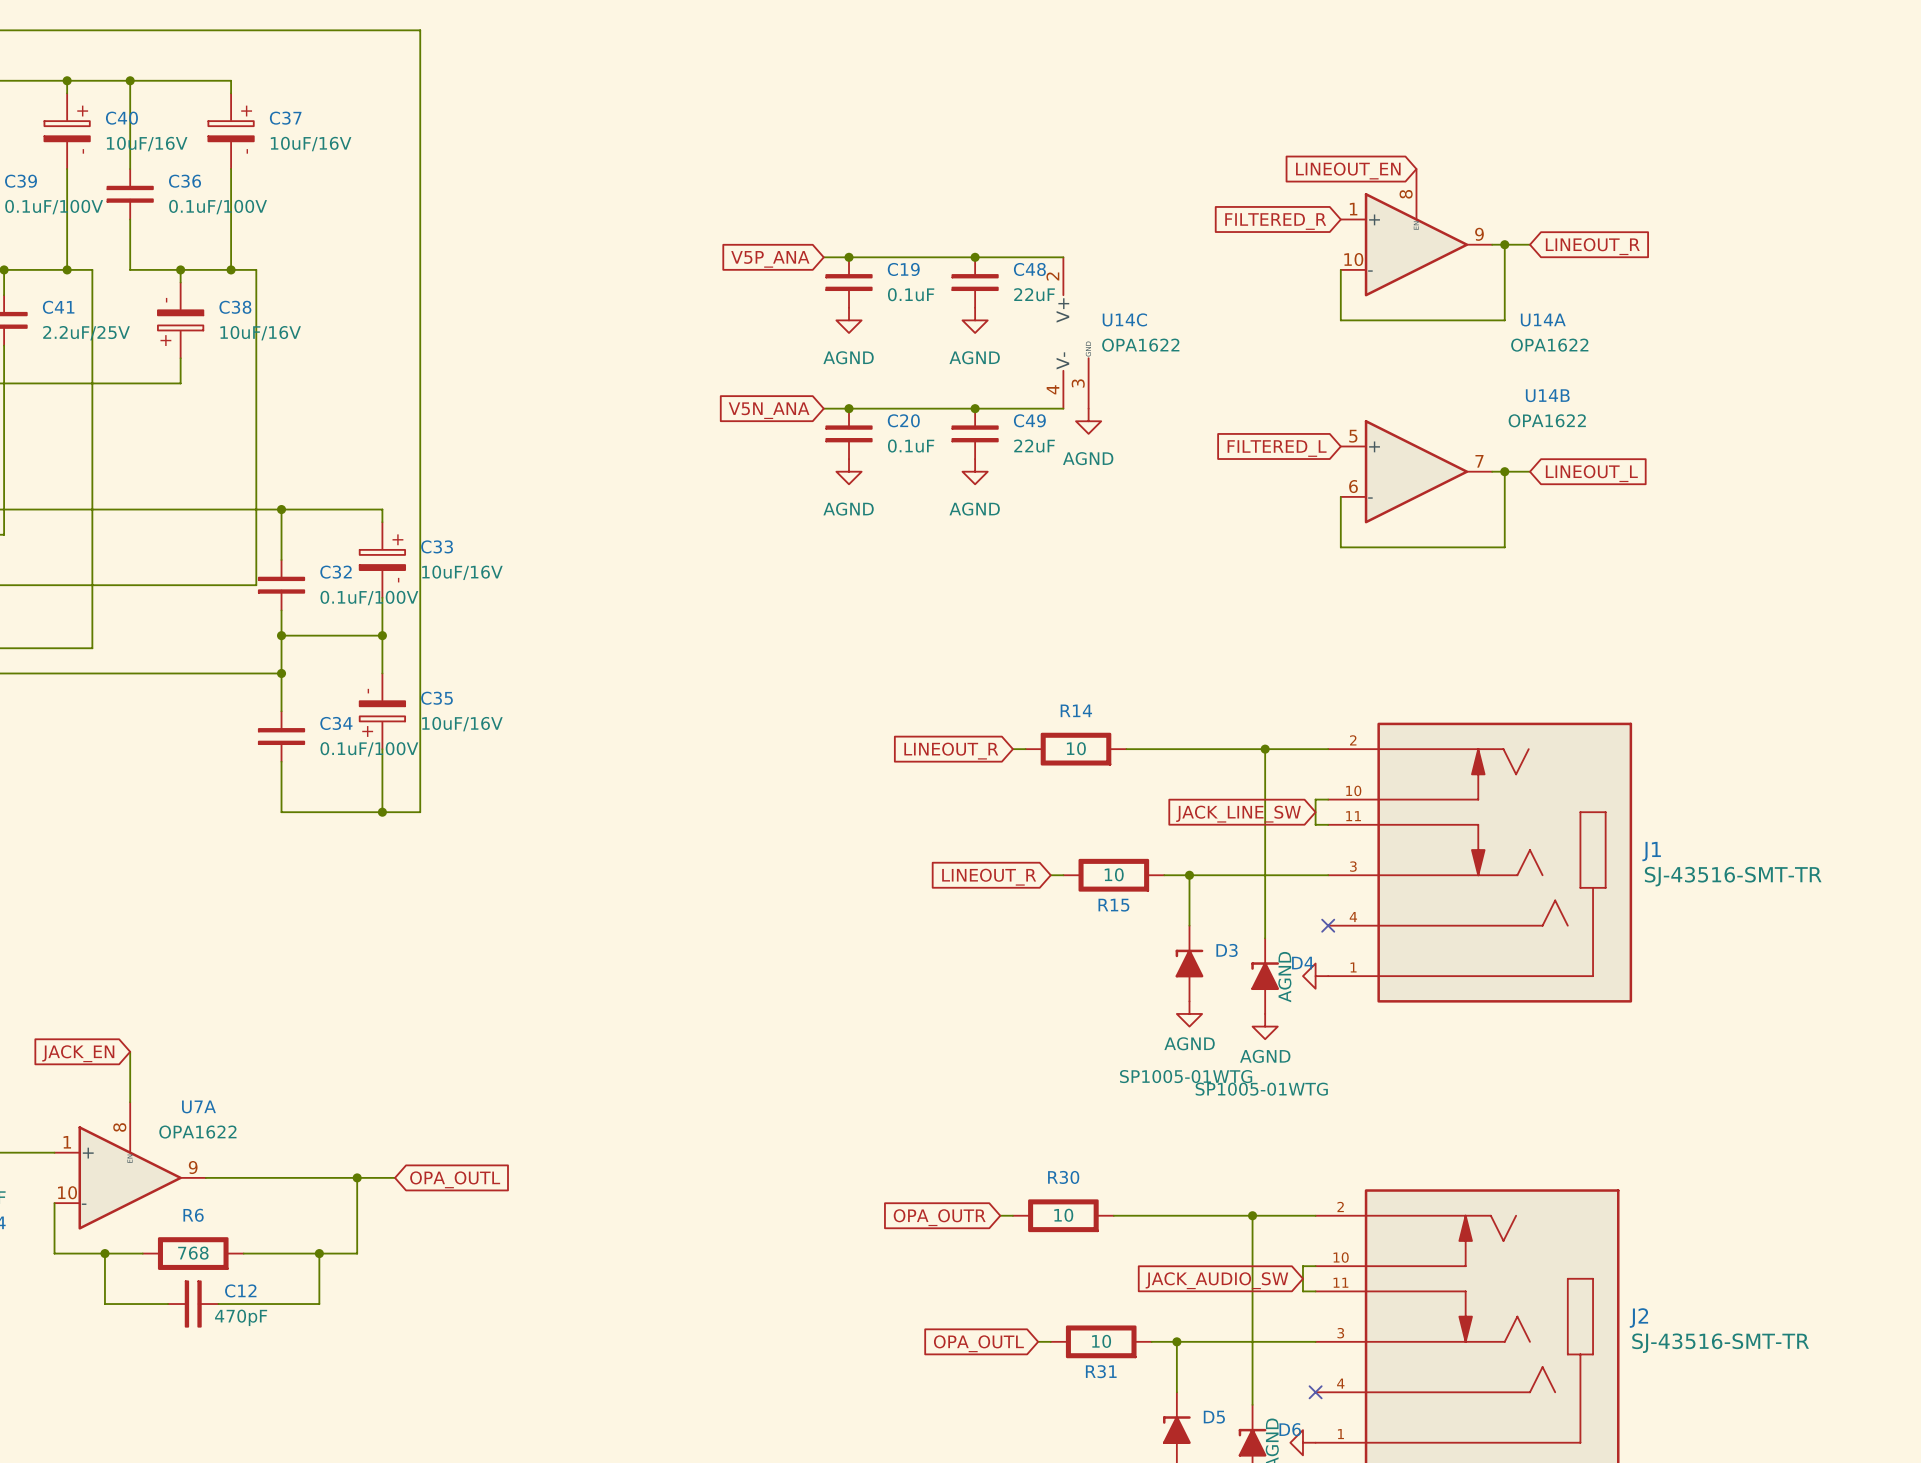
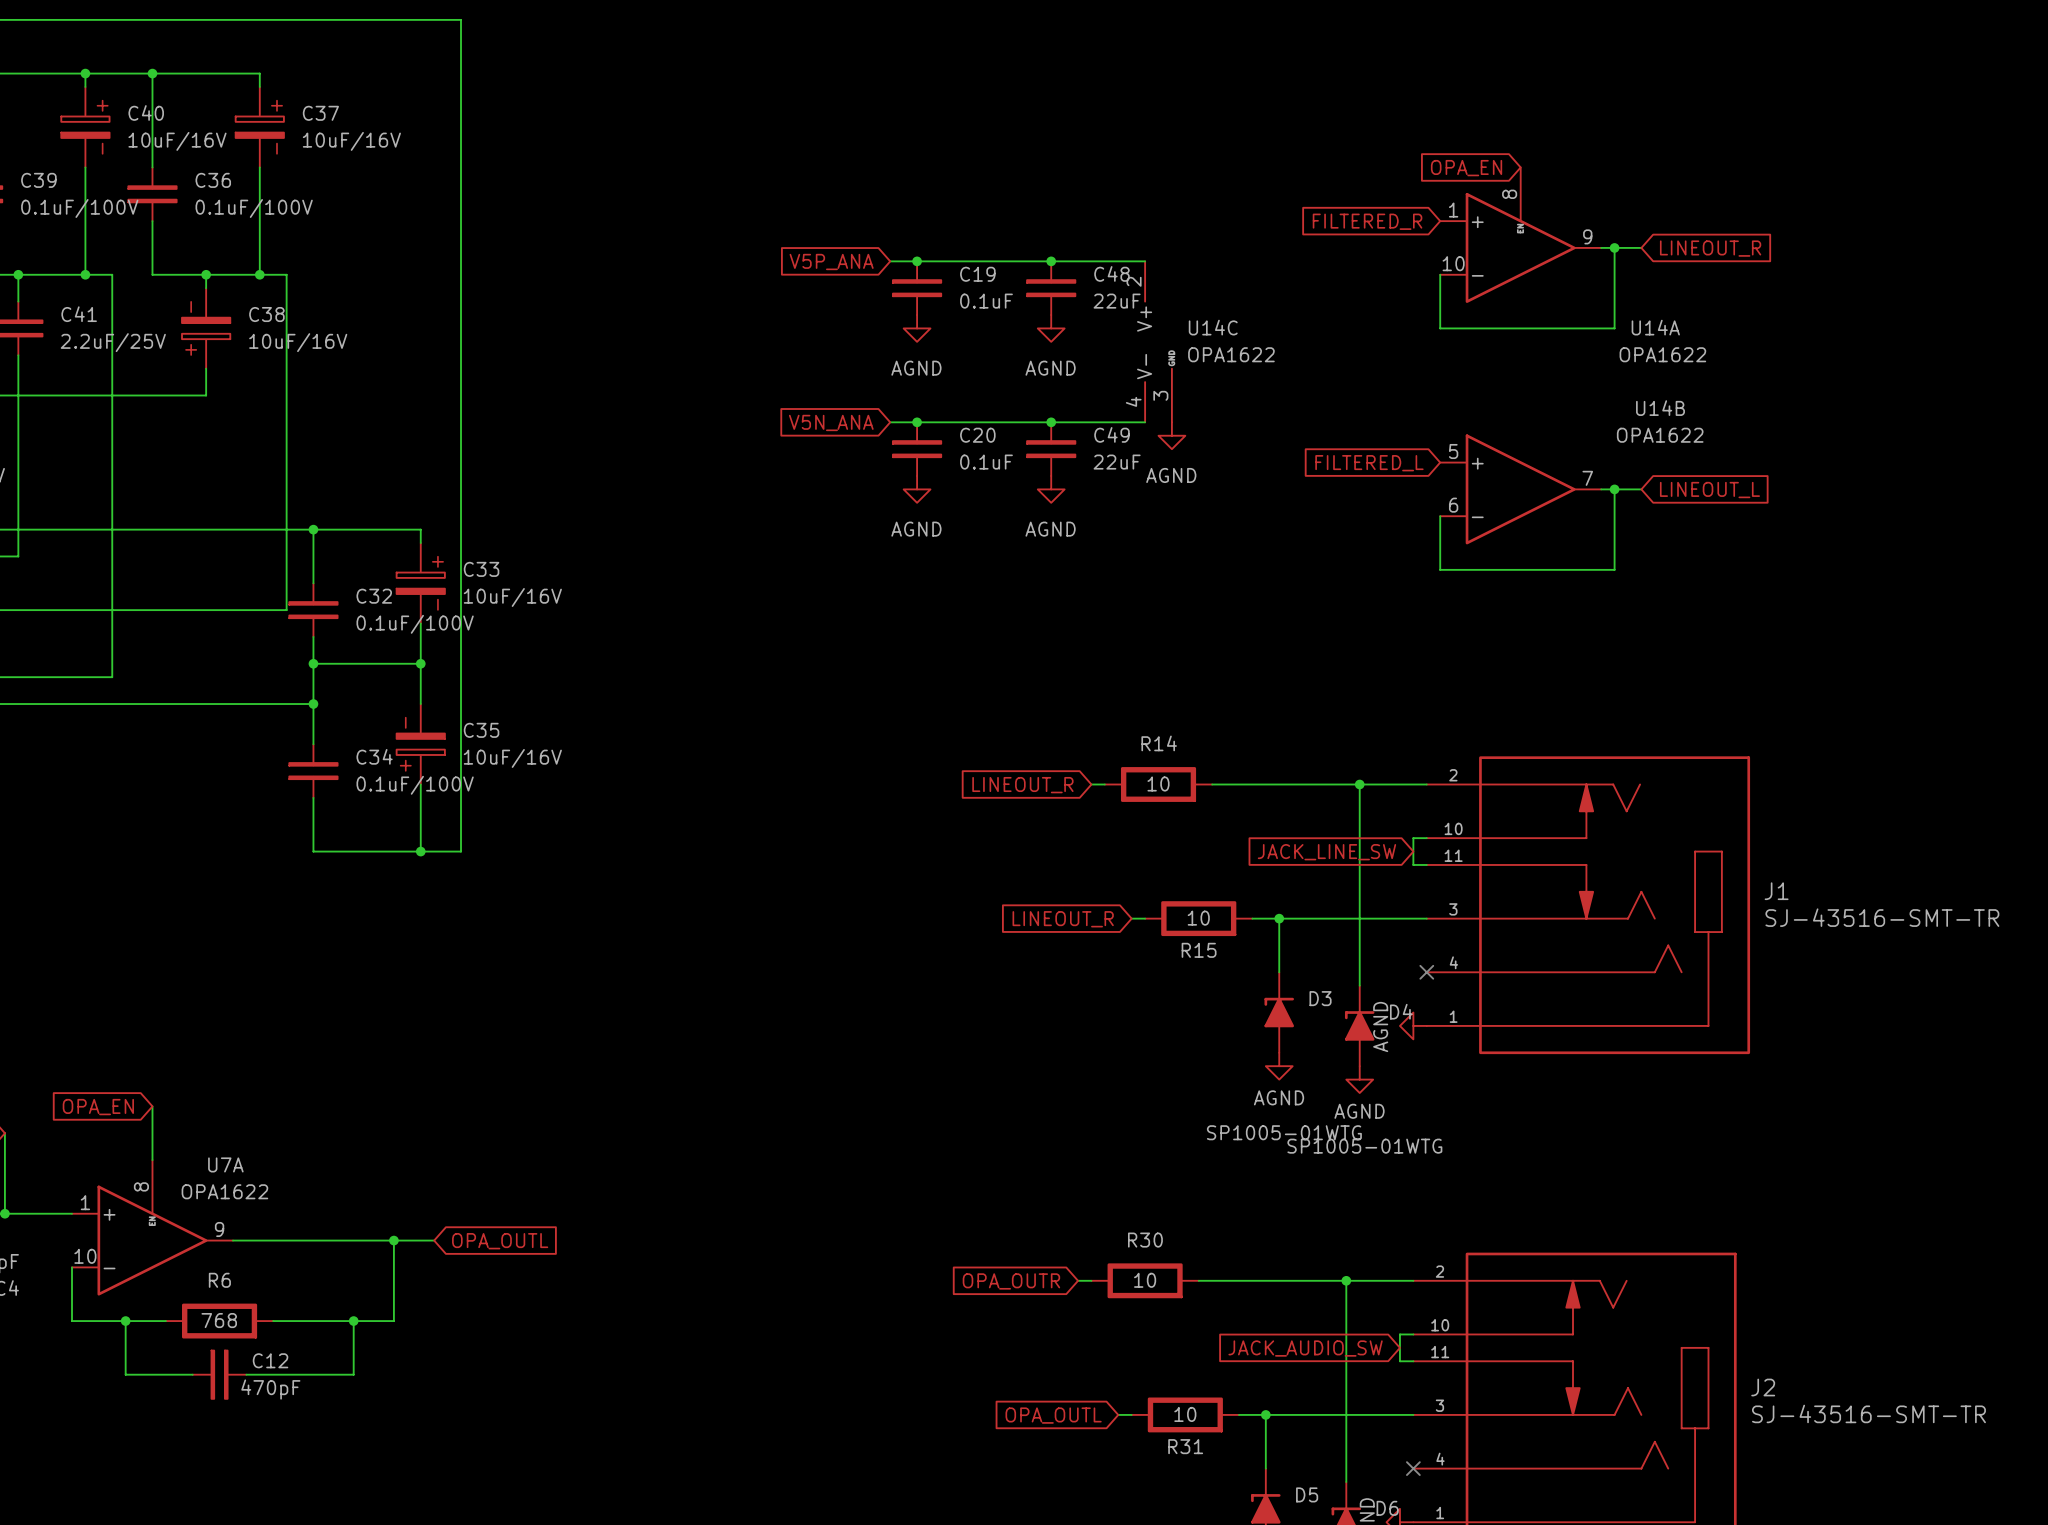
global label: LINEOUT_EN (1348, 170) -> OPA_EN (1466, 168)
global label: JACK_EN (78, 1053) -> OPA_EN (98, 1107)

